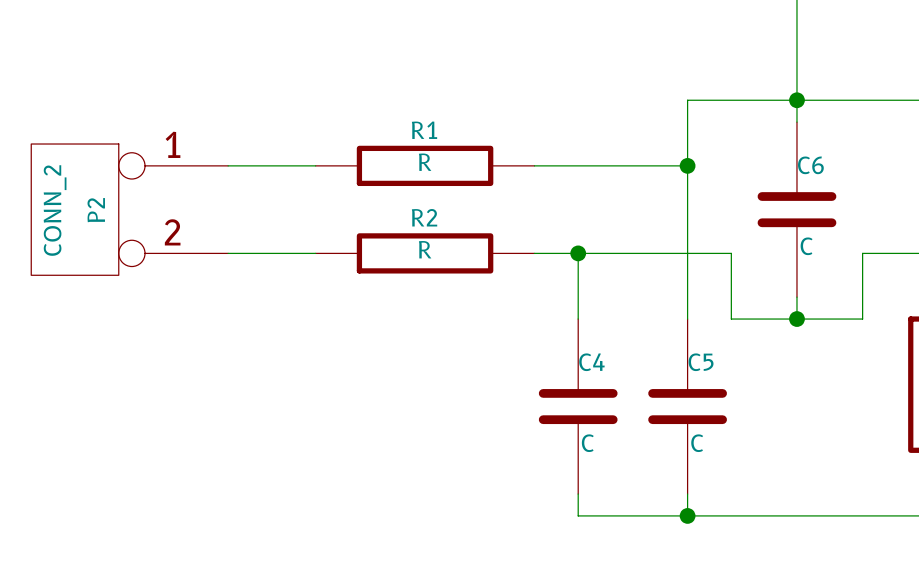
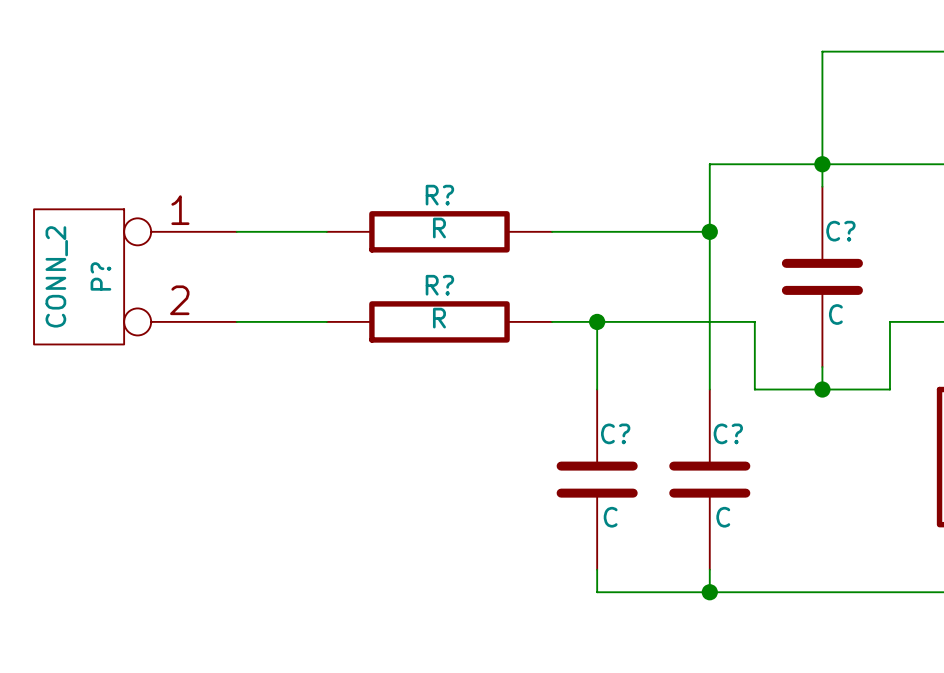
R1 name: R1 (424, 130) -> R? (439, 195)
C6 name: C6 (810, 165) -> C? (840, 231)
P2 name: P2 (96, 210) -> P? (100, 276)
R2 name: R2 (424, 217) -> R? (439, 285)
C4 name: C4 (591, 362) -> C? (615, 433)
C5 name: C5 (701, 362) -> C? (728, 433)

